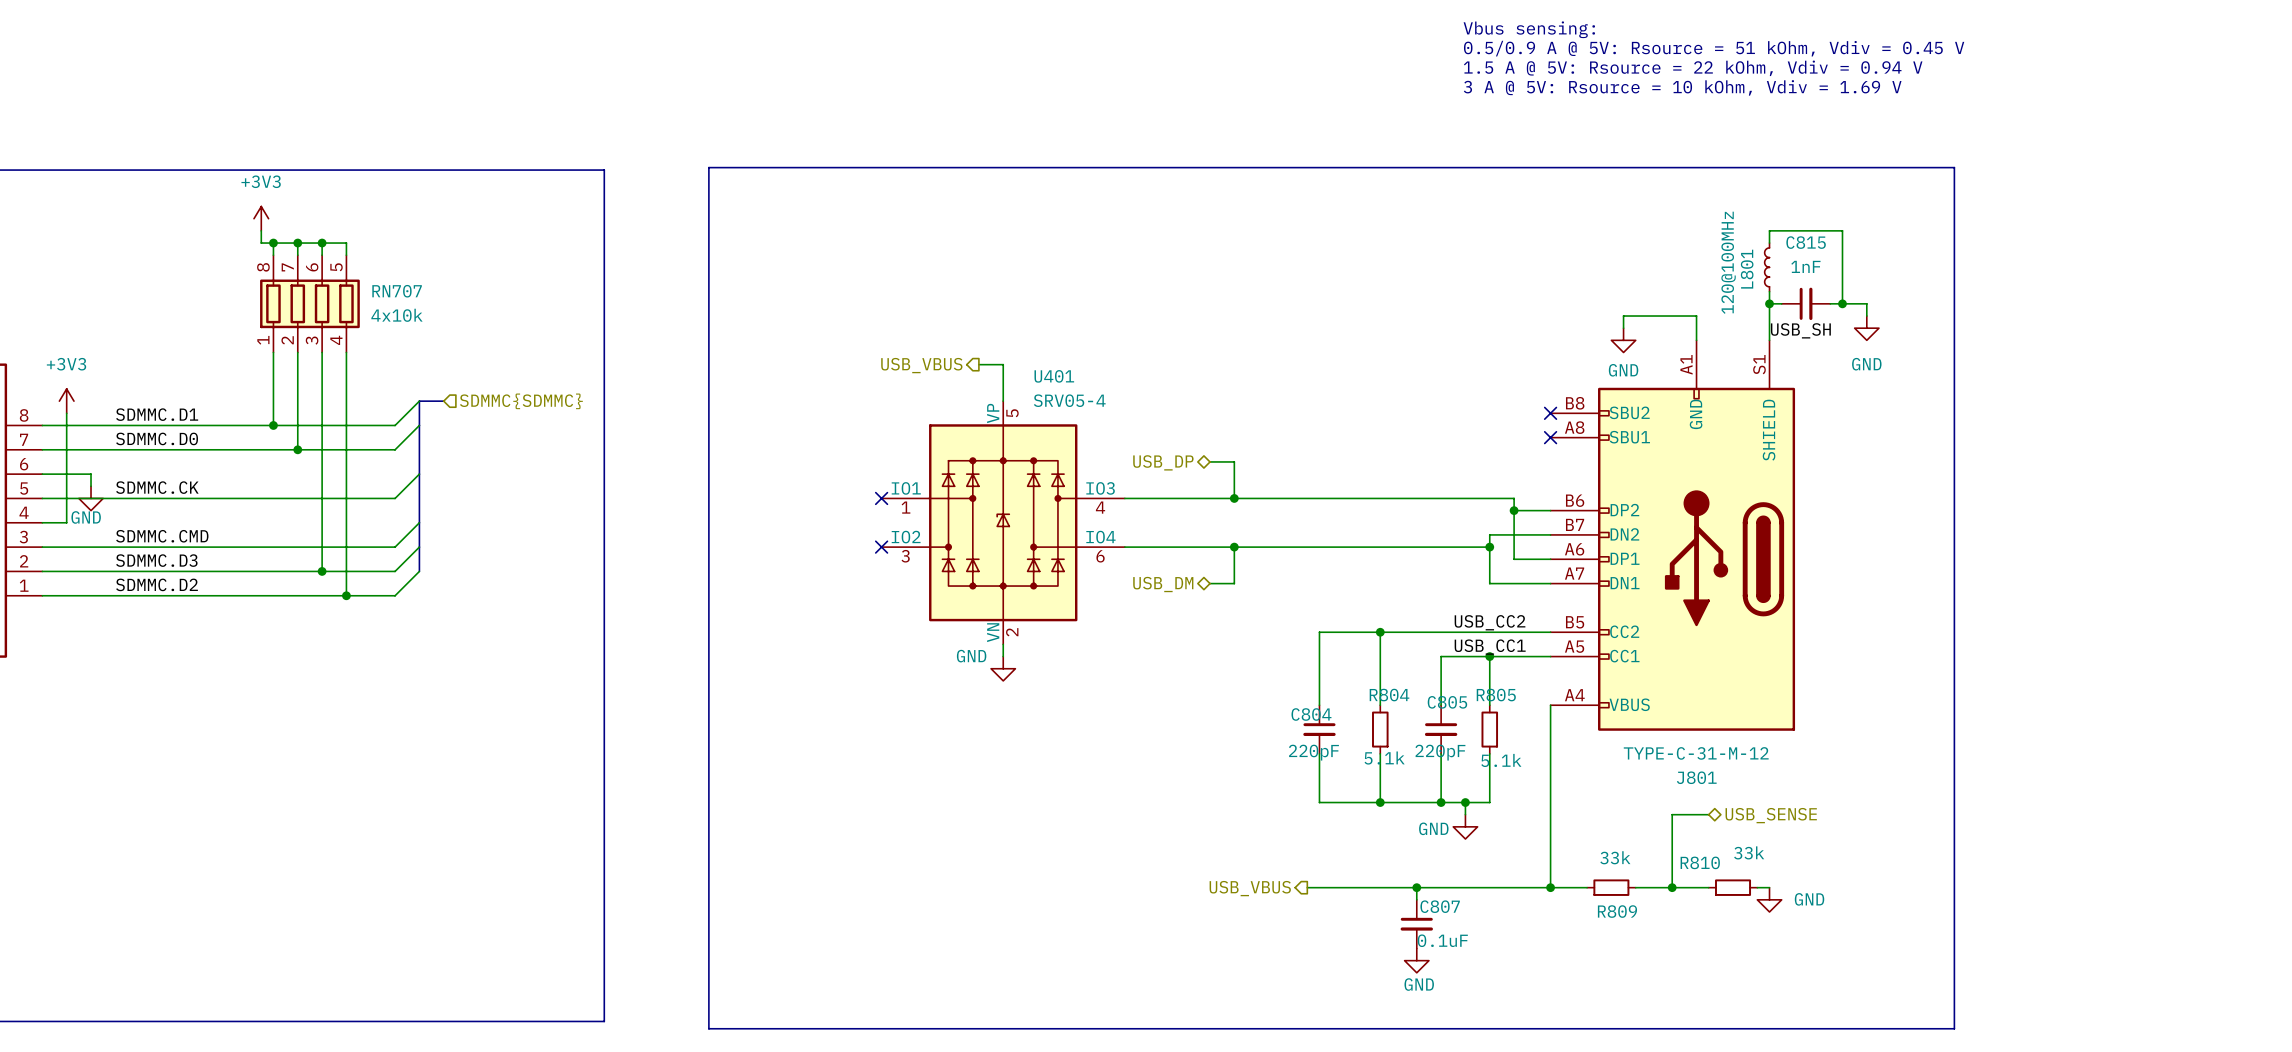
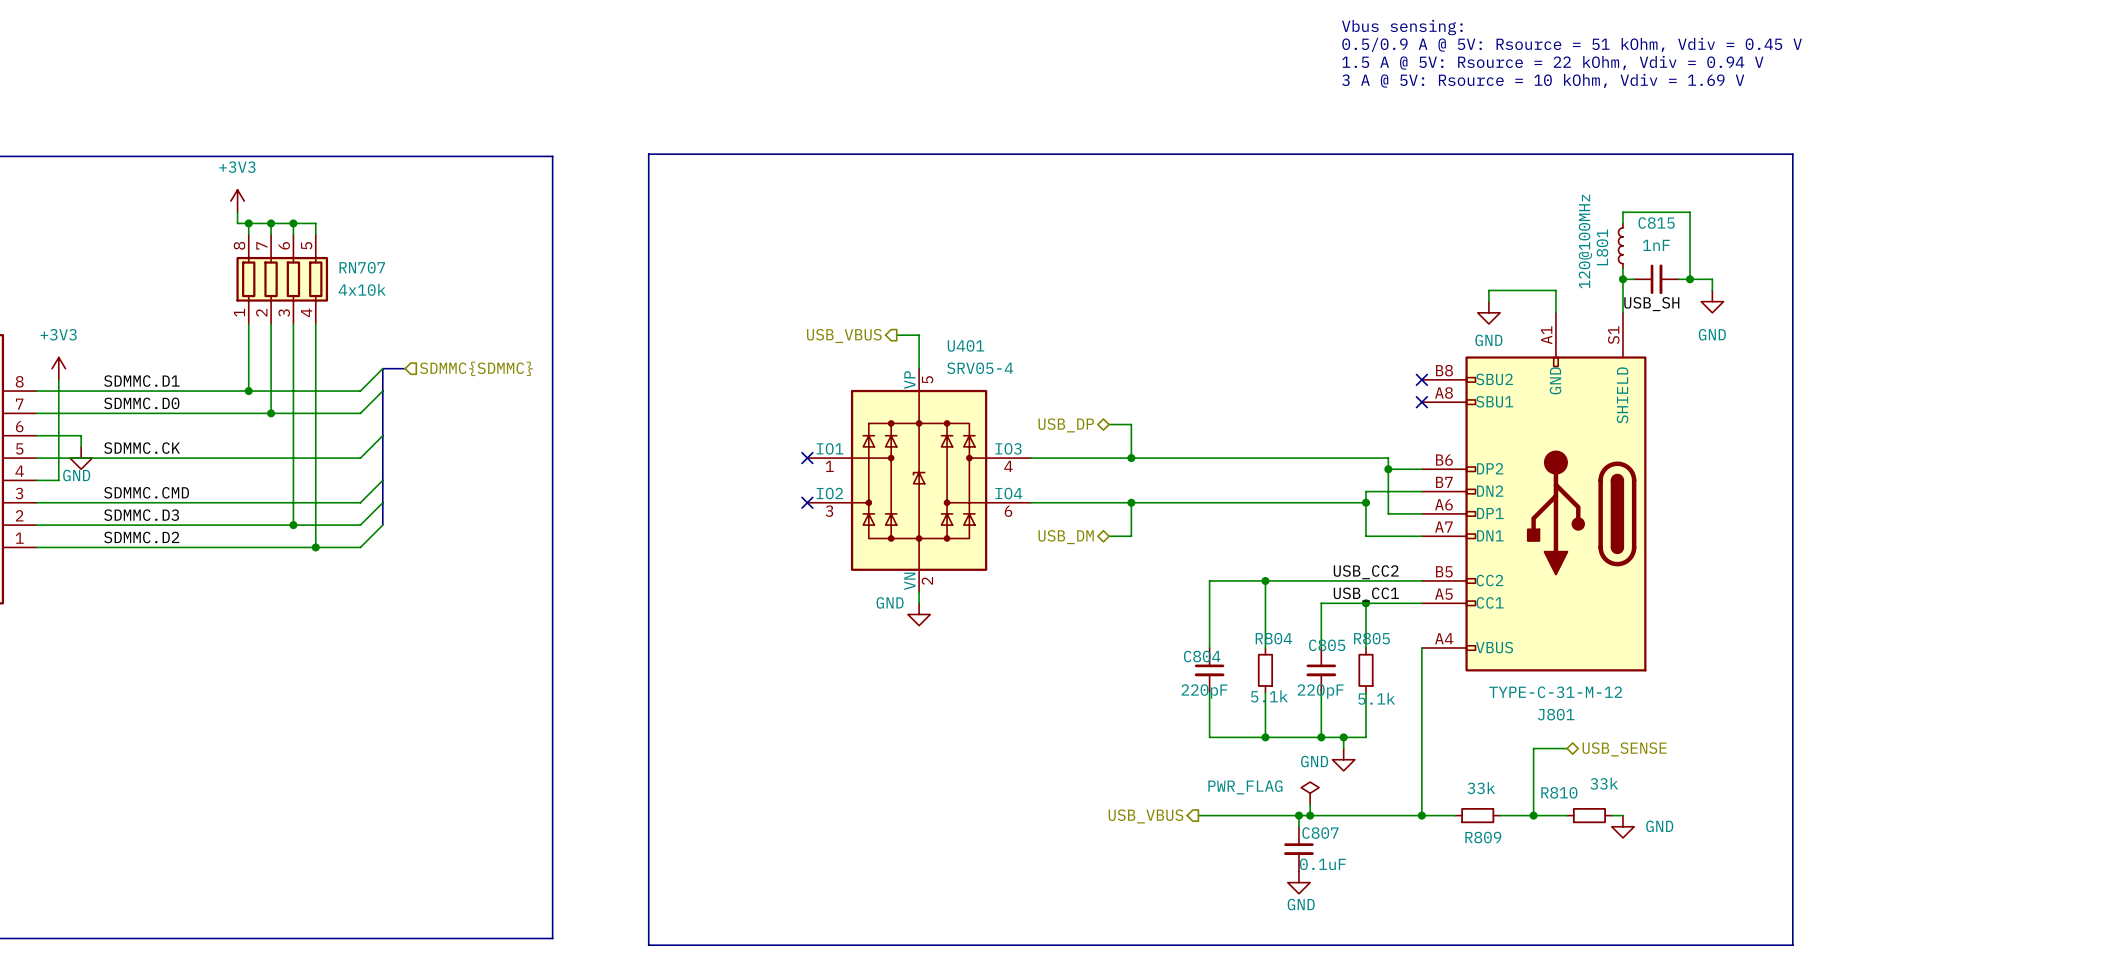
power symbol: none -> PWR_FLAG (1310, 793)
wire: none -> (1310, 804) (1310, 815)
junction: none -> (1310, 815)

